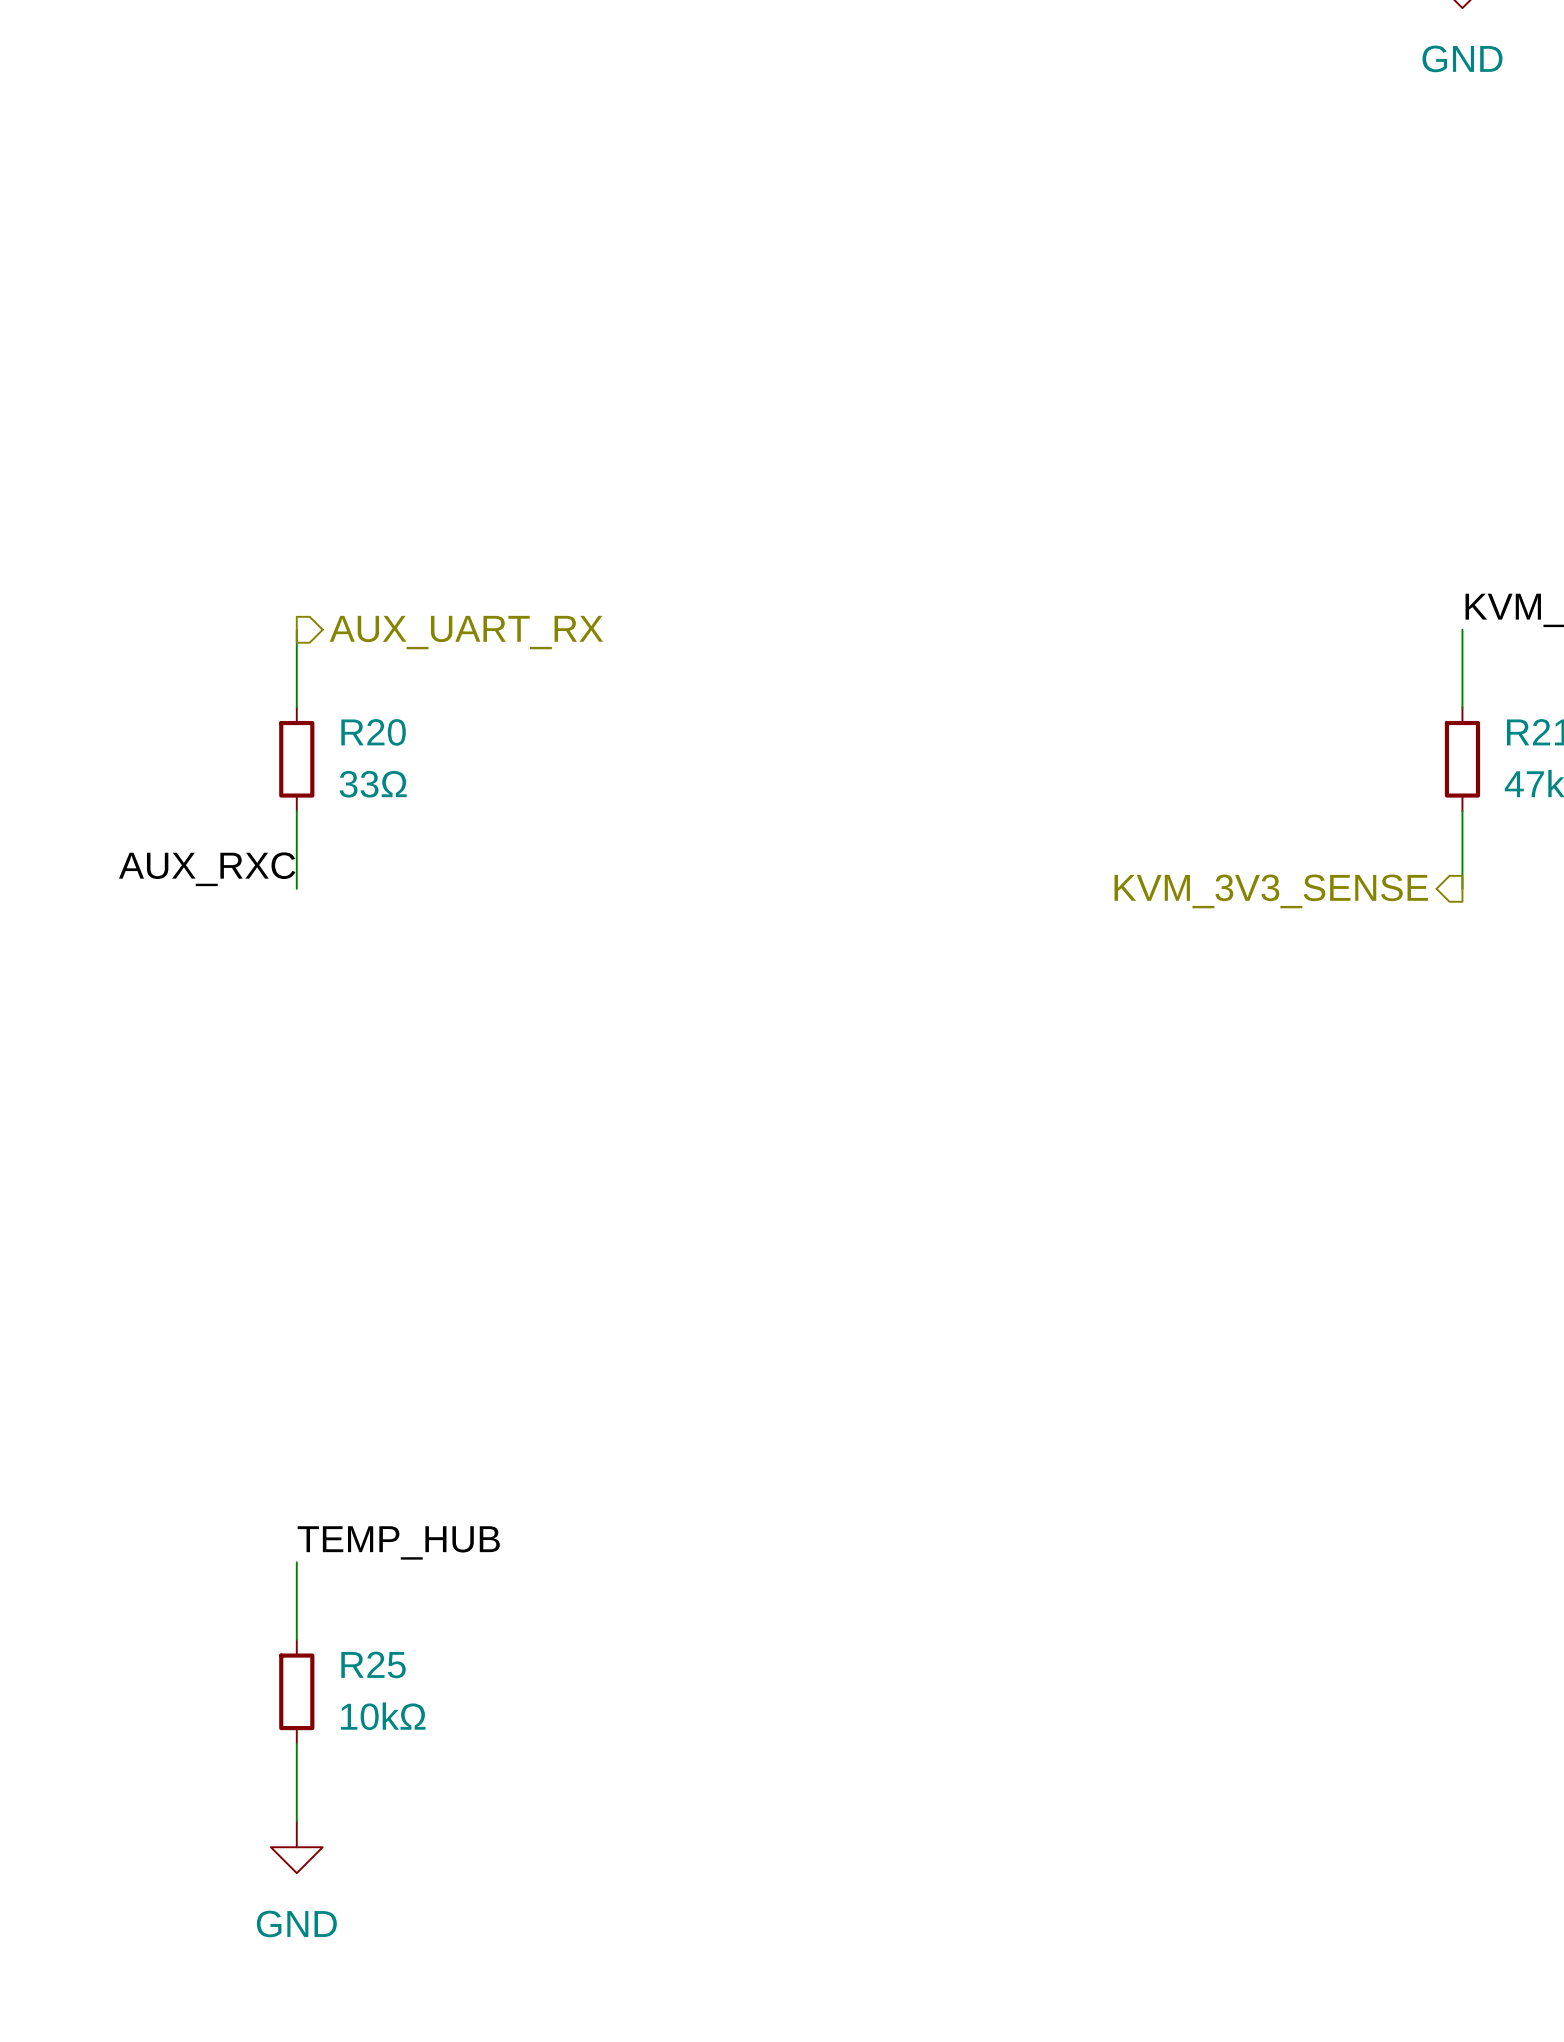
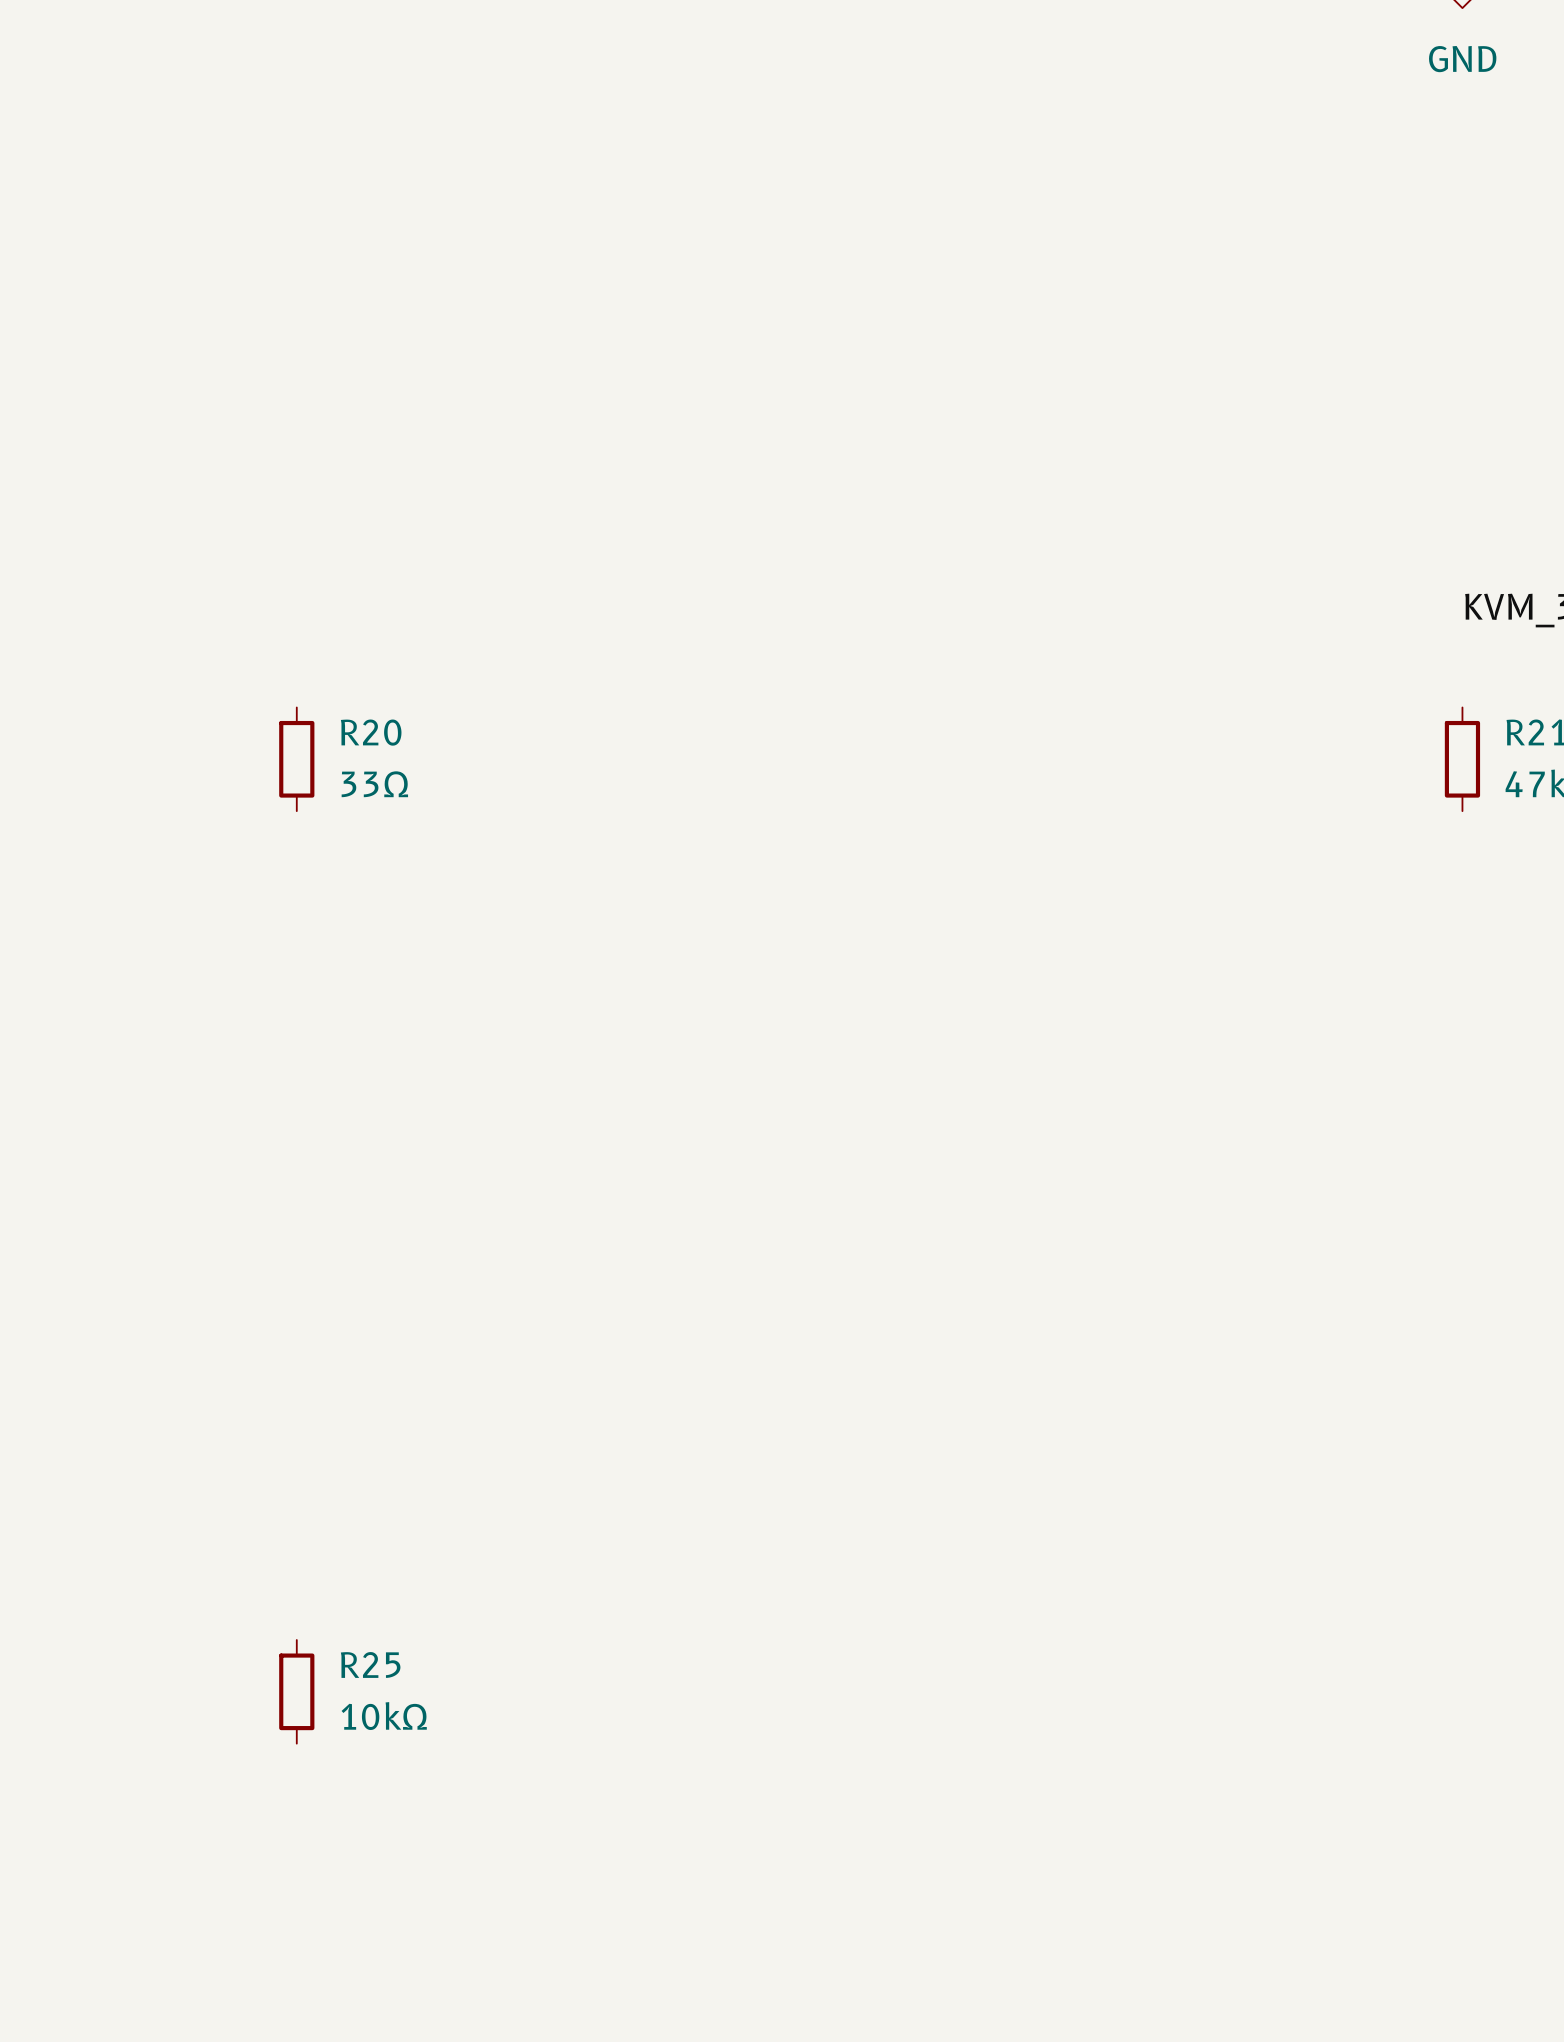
wire: (296, 629) (296, 707) -> none
wire: (1462, 629) (1462, 707) -> none
hierarchical label: AUX_UART_RX (466, 632) -> none
wire: (296, 811) (296, 888) -> none
wire: (1462, 811) (1462, 888) -> none
label: AUX_RXC (207, 869) -> none
hierarchical label: KVM_3V3_SENSE (1271, 891) -> none
label: TEMP_HUB (398, 1542) -> none
wire: (296, 1562) (296, 1640) -> none
wire: (296, 1743) (296, 1821) -> none
power symbol: GND (296, 1847) -> none

